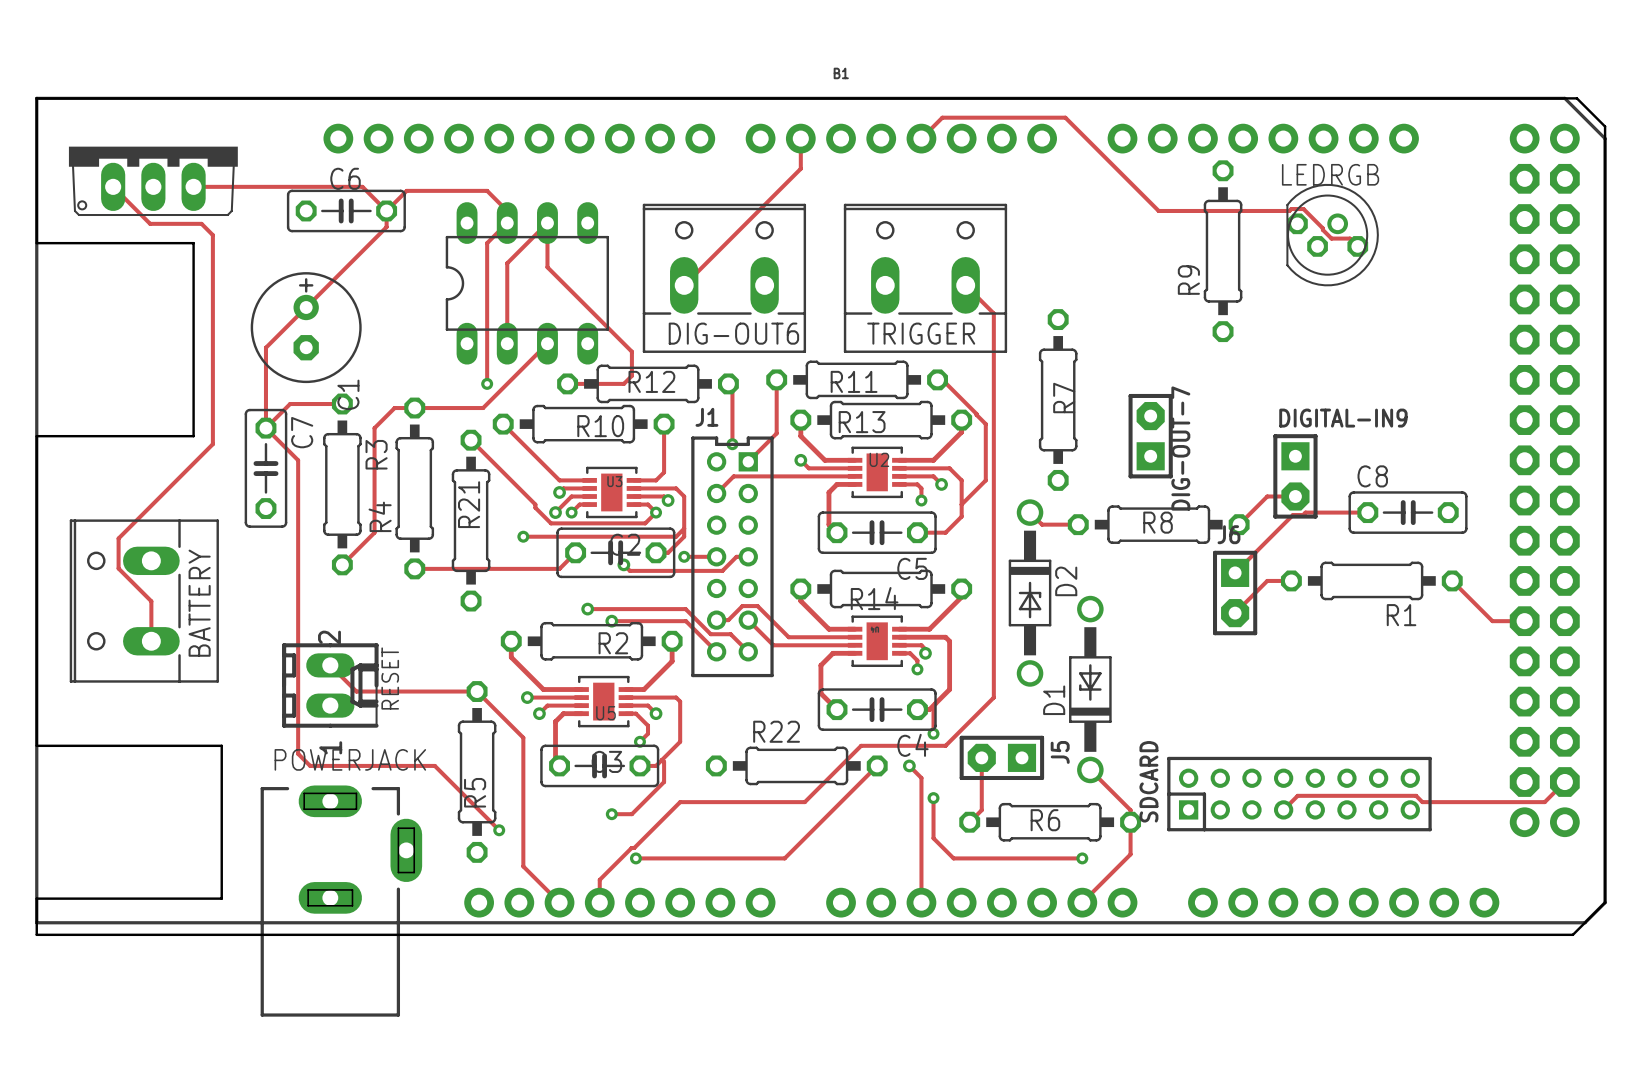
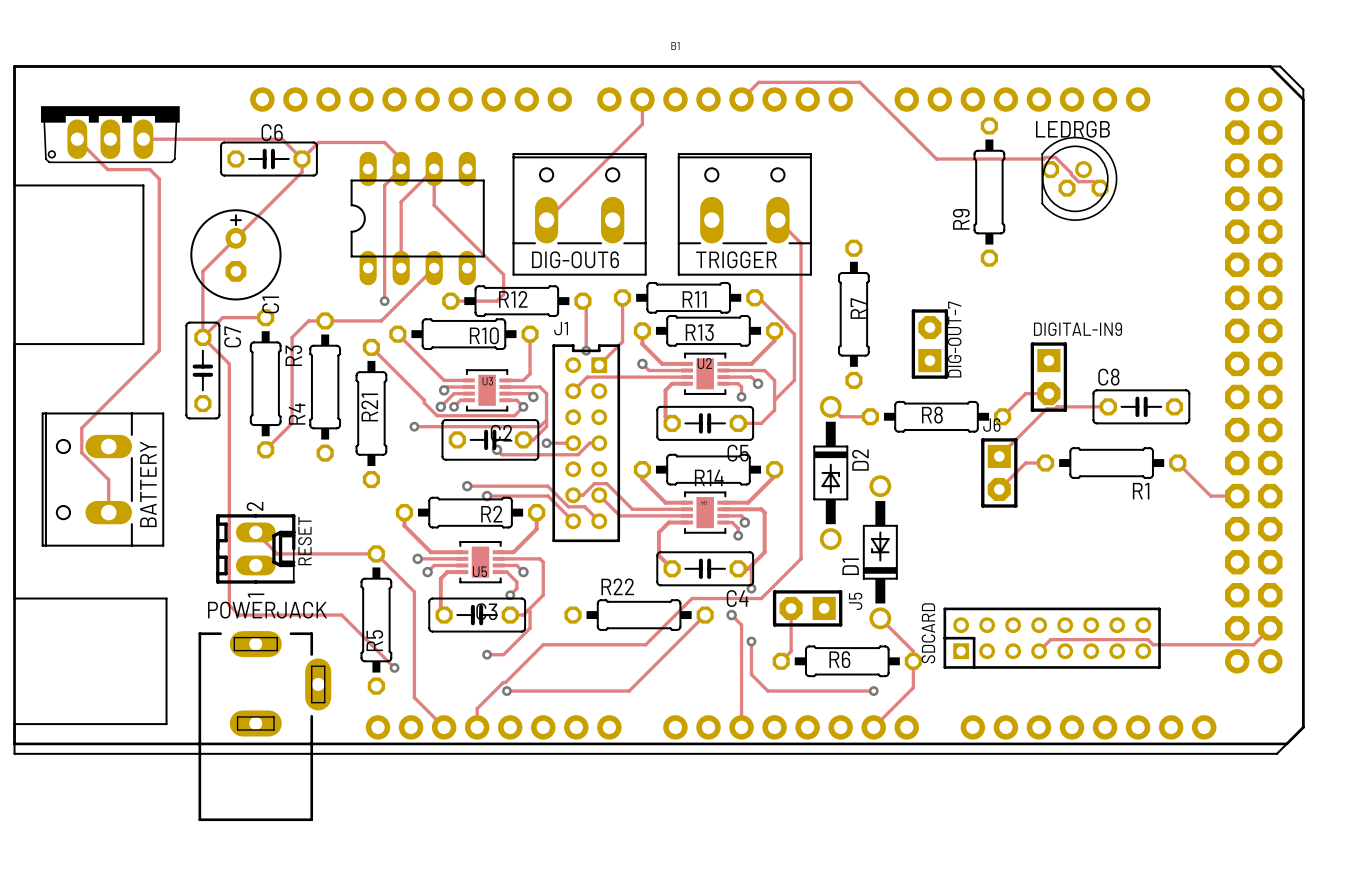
track: (575, 552) (559, 568) (414, 568) -> none

